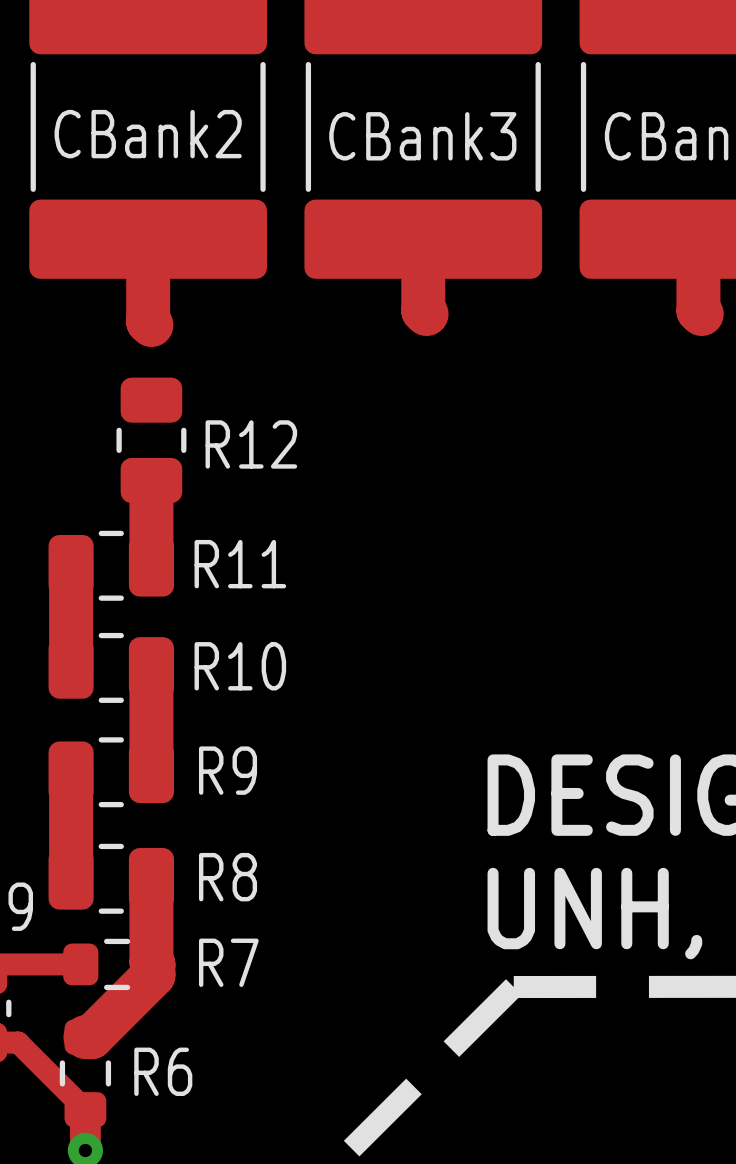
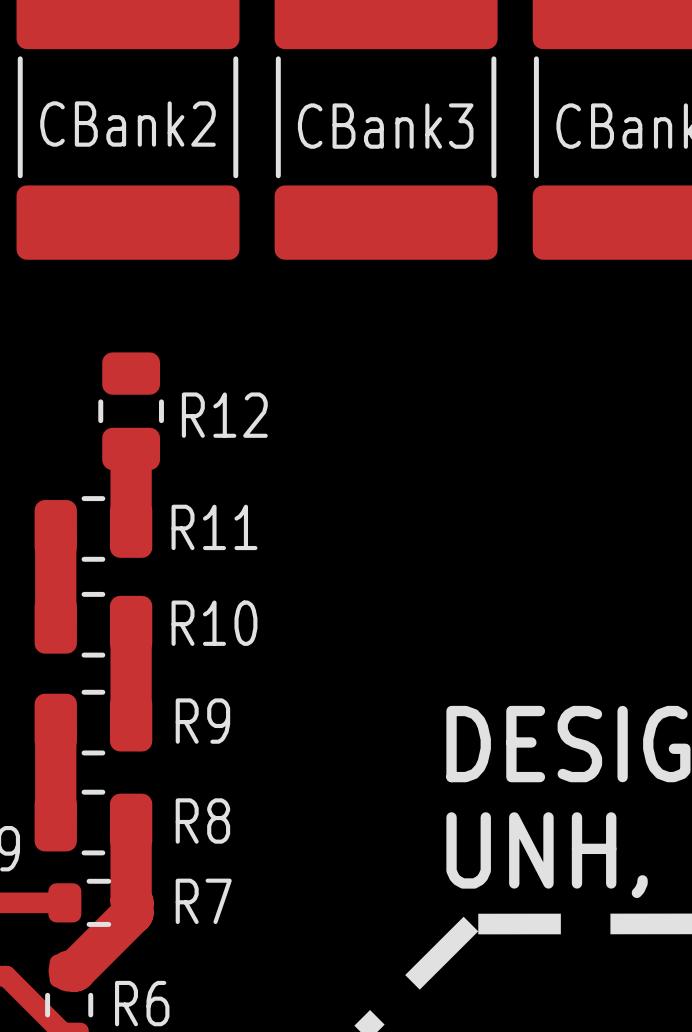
track: (148, 239) (148, 321) (151, 325) -> none
track: (423, 239) (423, 310) (426, 314) -> none
track: (698, 239) (698, 310) (701, 314) -> none

